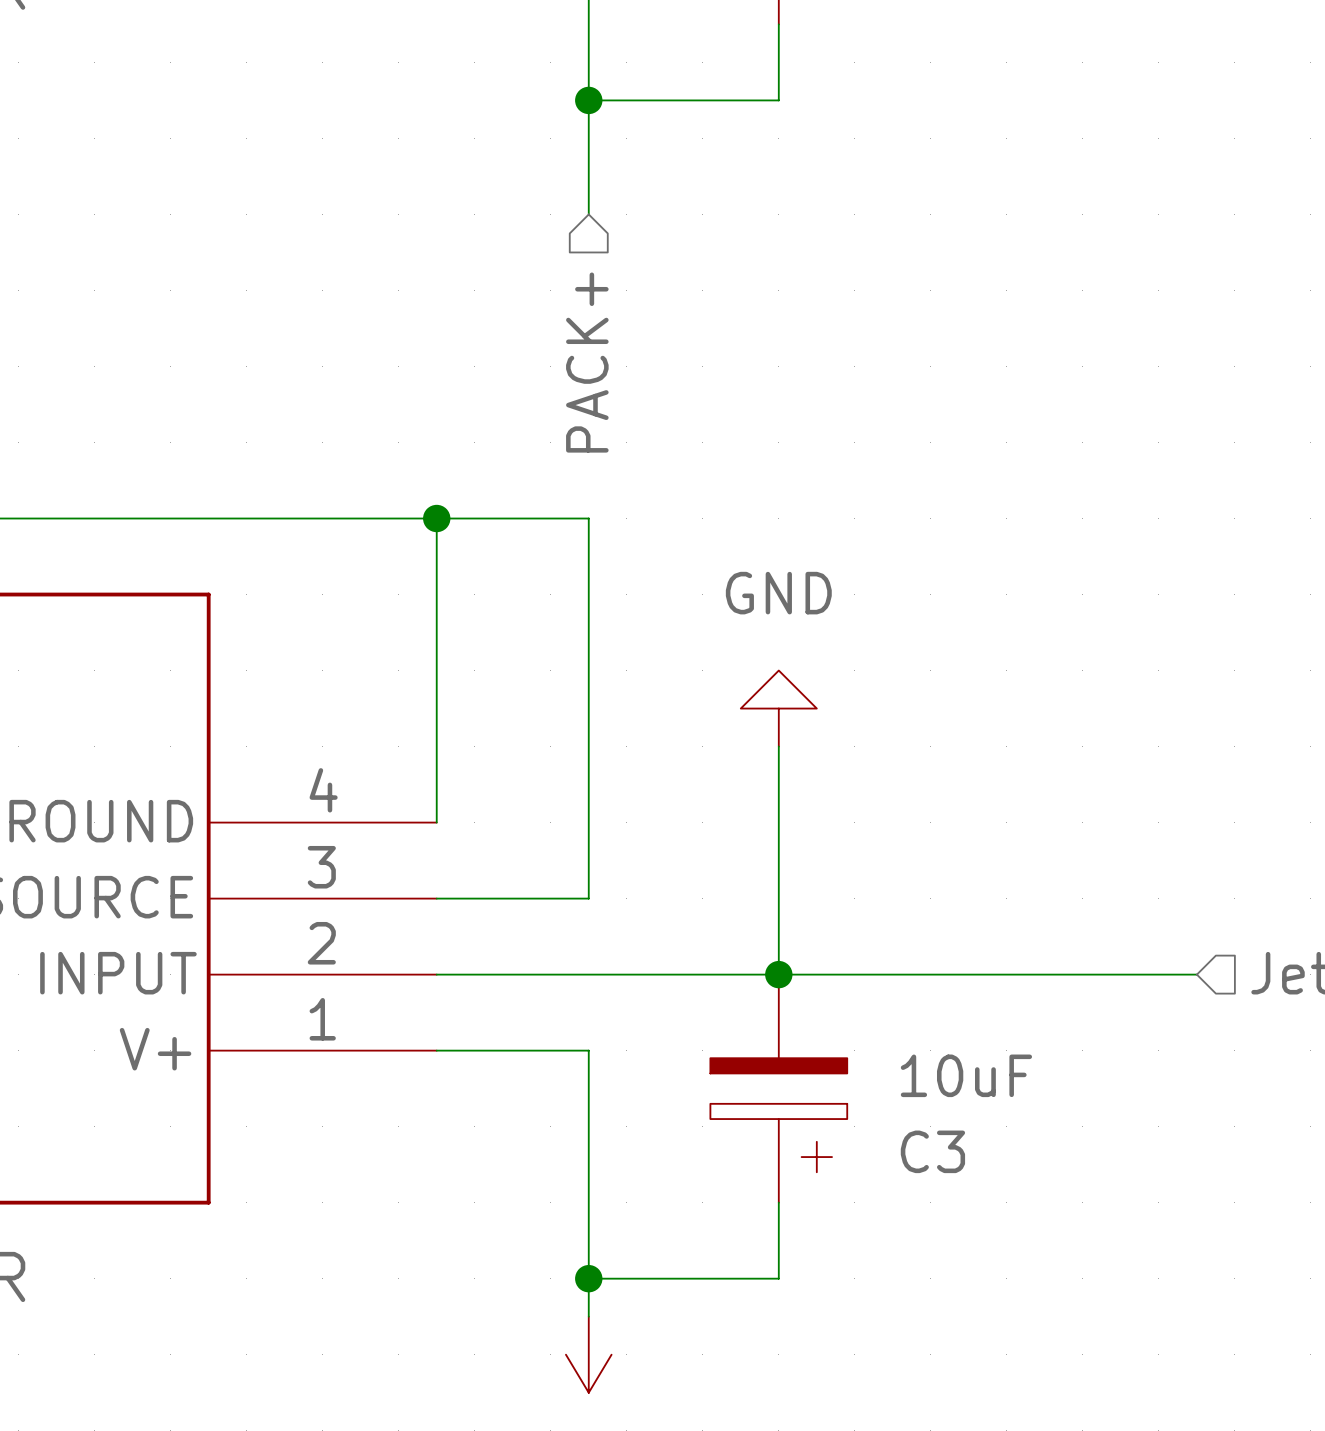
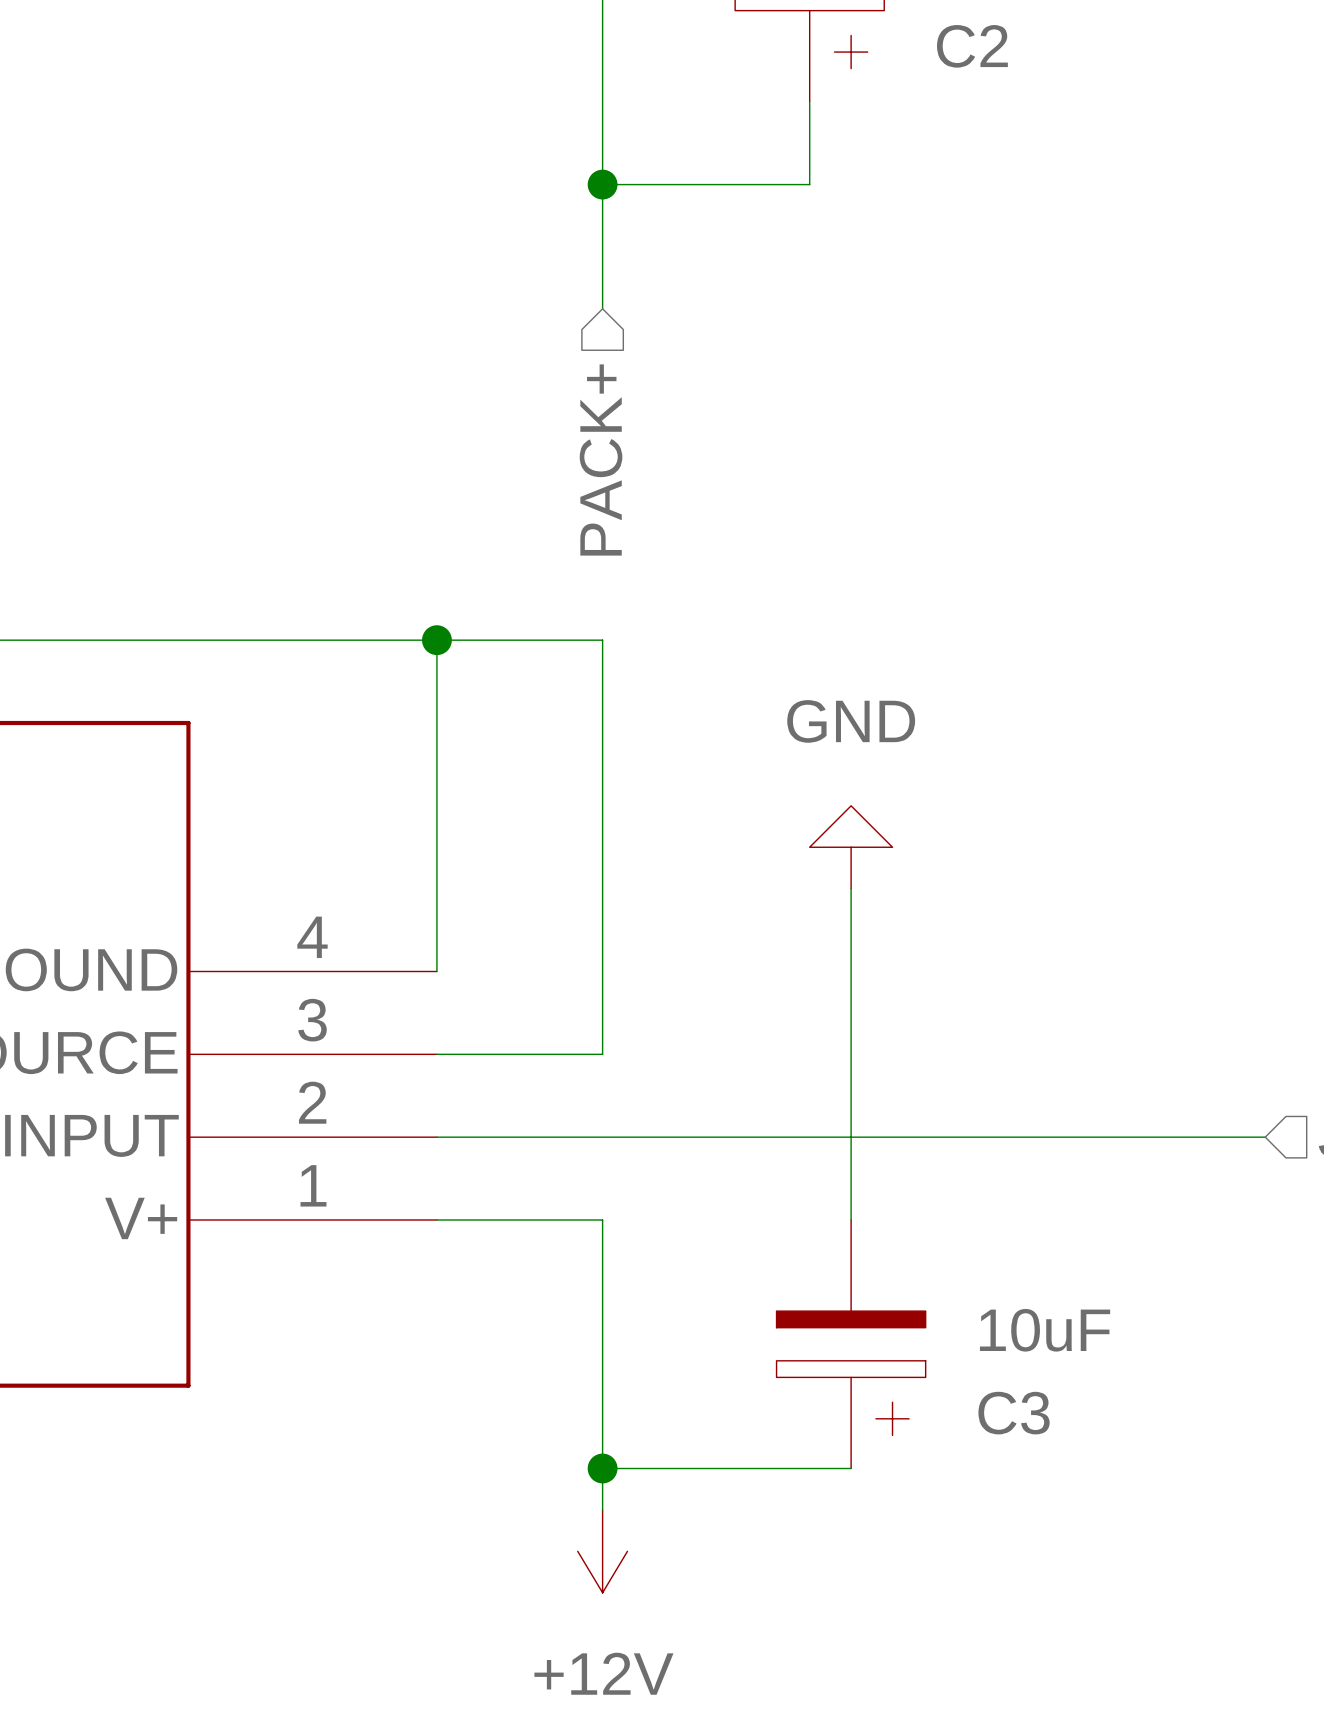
power symbol position: GND (778, 708) -> GND (851, 847)
wire: (778, 746) (778, 974) -> none
wire: none -> (851, 888) (851, 1220)
junction: (778, 974) -> none
C3 position: (778, 1088) -> (851, 1344)
wire: (778, 1202) (778, 1278) -> (851, 1468) (809, 1468)

